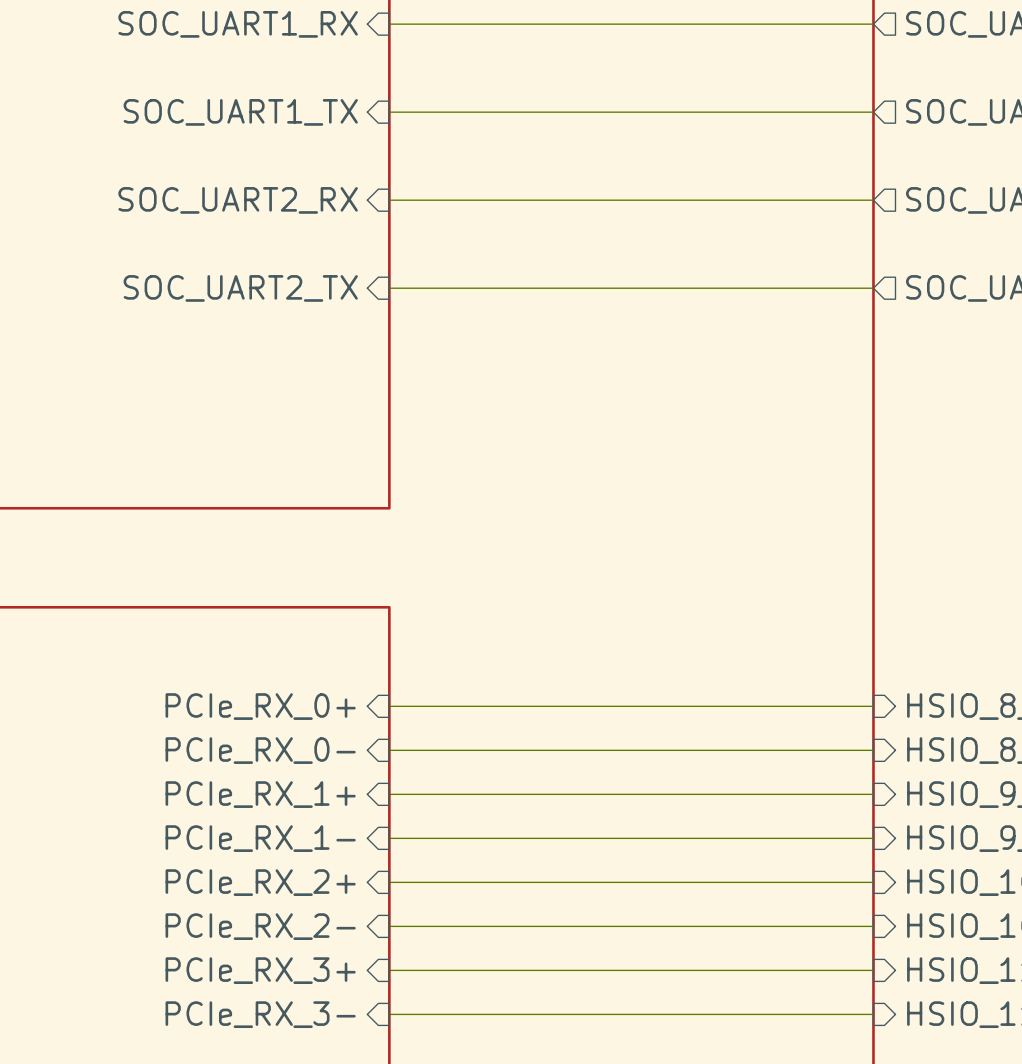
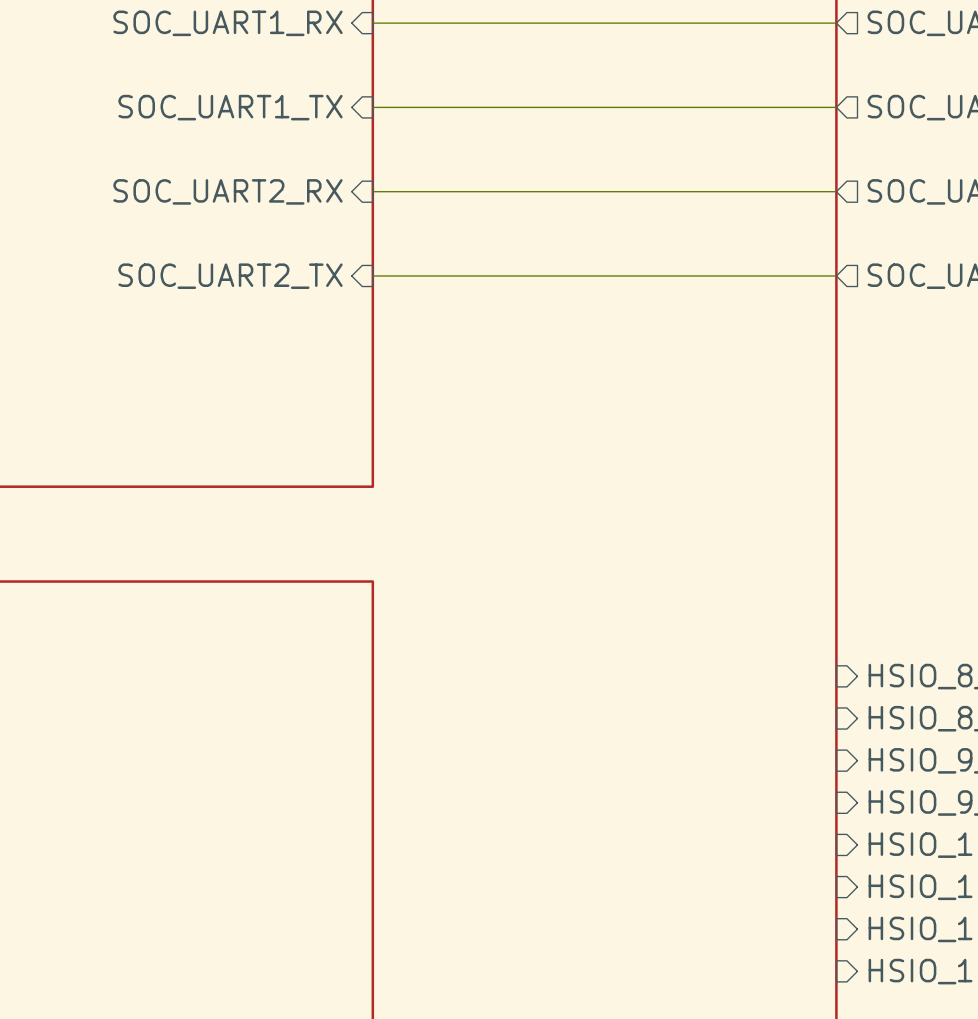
sheet pin: PCIe_RX_0+ (260, 706) -> none
wire: (389, 706) (873, 706) -> none
sheet pin: PCIe_RX_0- (260, 750) -> none
wire: (389, 750) (873, 750) -> none
sheet pin: PCIe_RX_1+ (260, 794) -> none
wire: (389, 794) (873, 794) -> none
sheet pin: PCIe_RX_1- (260, 838) -> none
wire: (389, 838) (873, 838) -> none
sheet pin: PCIe_RX_2+ (260, 882) -> none
wire: (389, 882) (873, 882) -> none
sheet pin: PCIe_RX_2- (260, 926) -> none
wire: (389, 926) (873, 926) -> none
sheet pin: PCIe_RX_3+ (260, 970) -> none
wire: (389, 970) (873, 970) -> none
sheet pin: PCIe_RX_3- (260, 1014) -> none
wire: (389, 1014) (873, 1014) -> none

